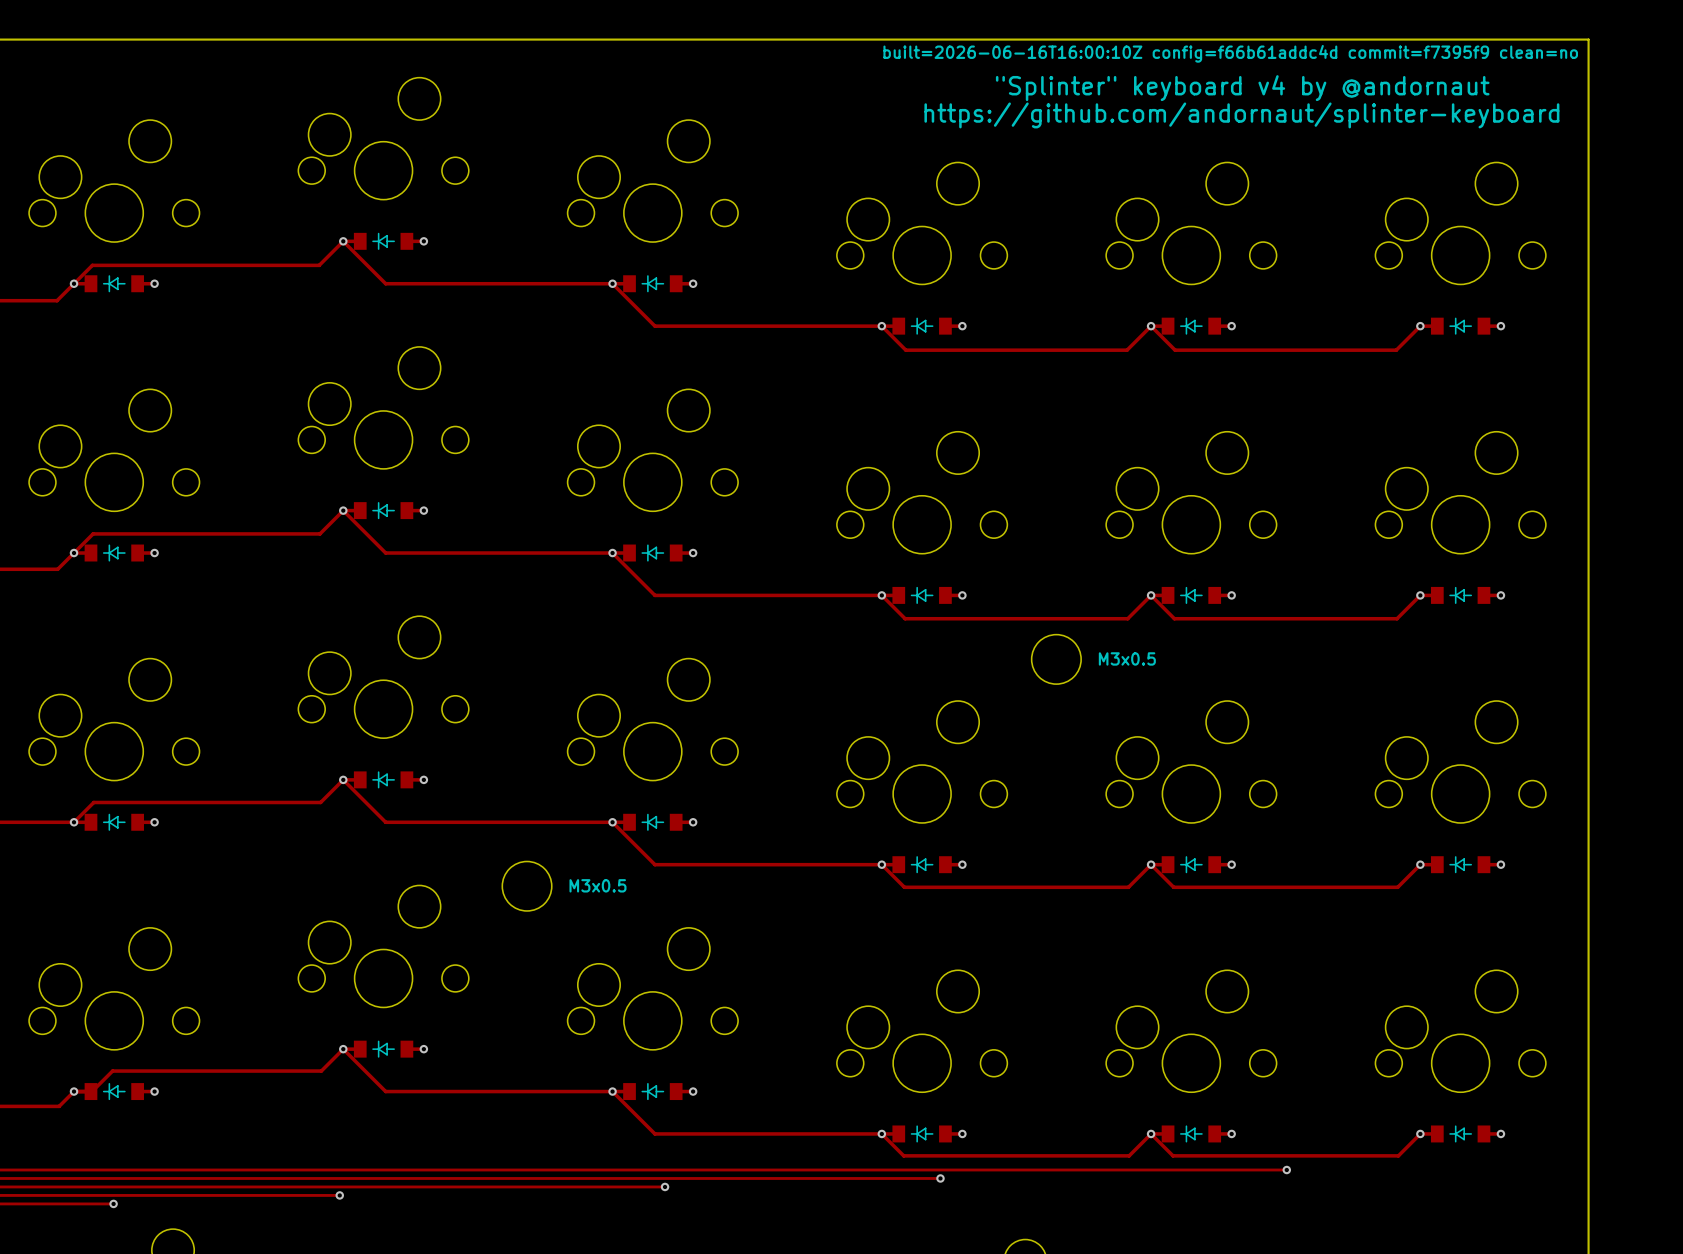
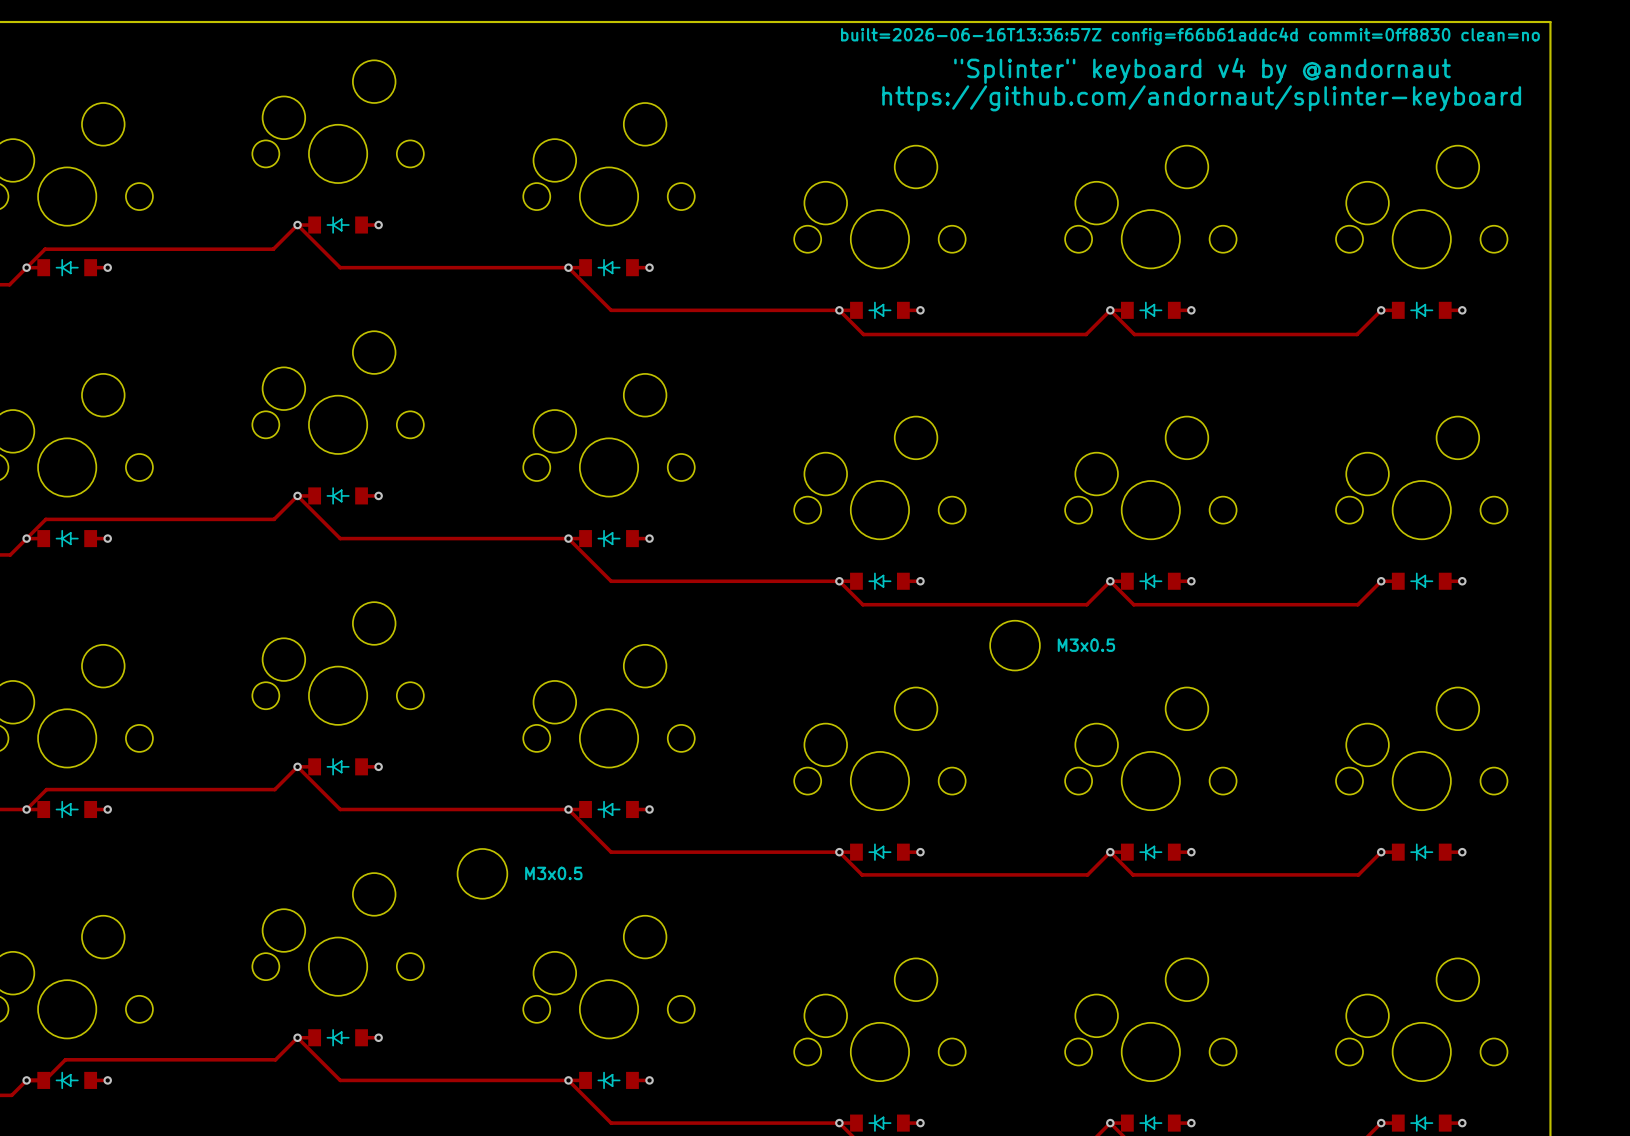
text: built=2026-06-16T16:00:10Z config=f66b61addc4d commit=f7395f9 clean=no (1230, 53) -> built=2026-06-16T13:36:57Z config=f66b61addc4d commit=0ff8830 clean=no (1190, 36)

